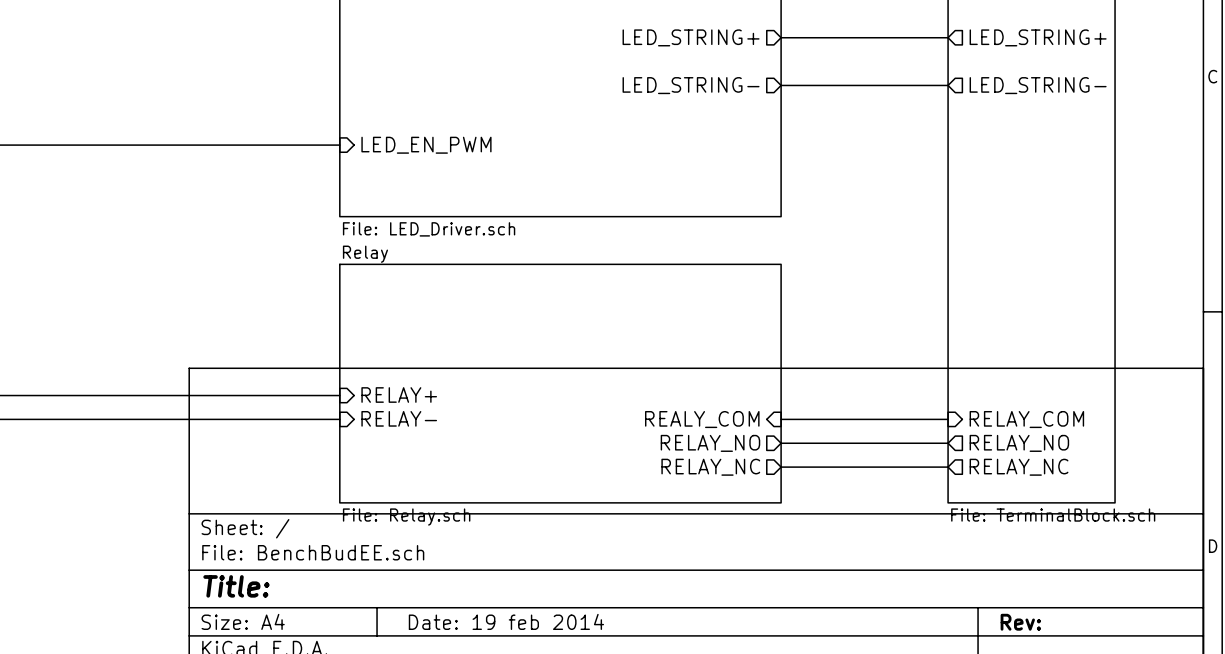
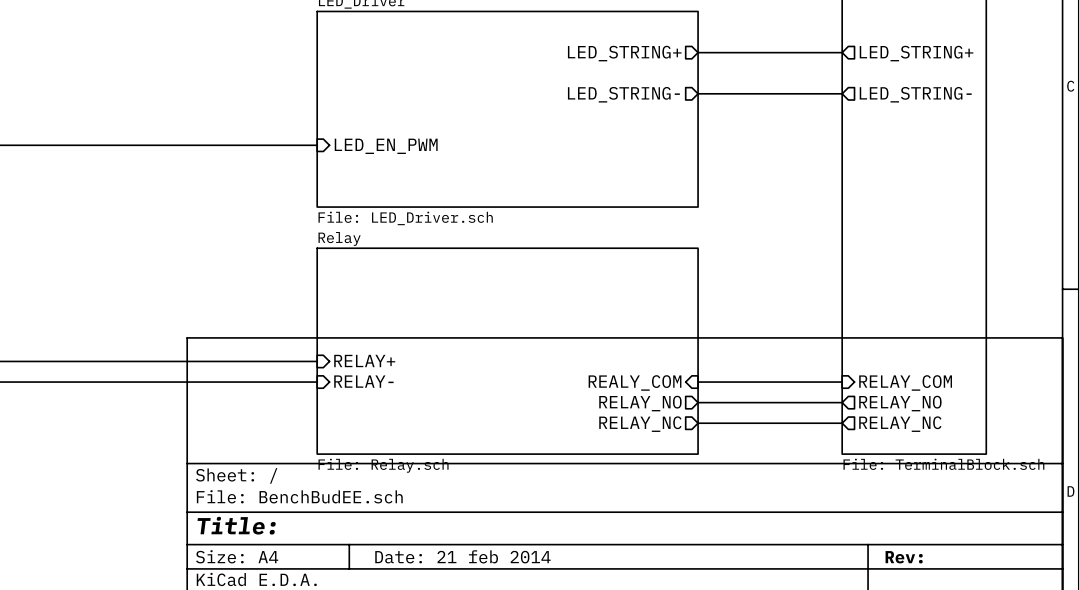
title block: Date: 19 feb 2014 (506, 621) -> Date: 21 feb 2014 (462, 556)

